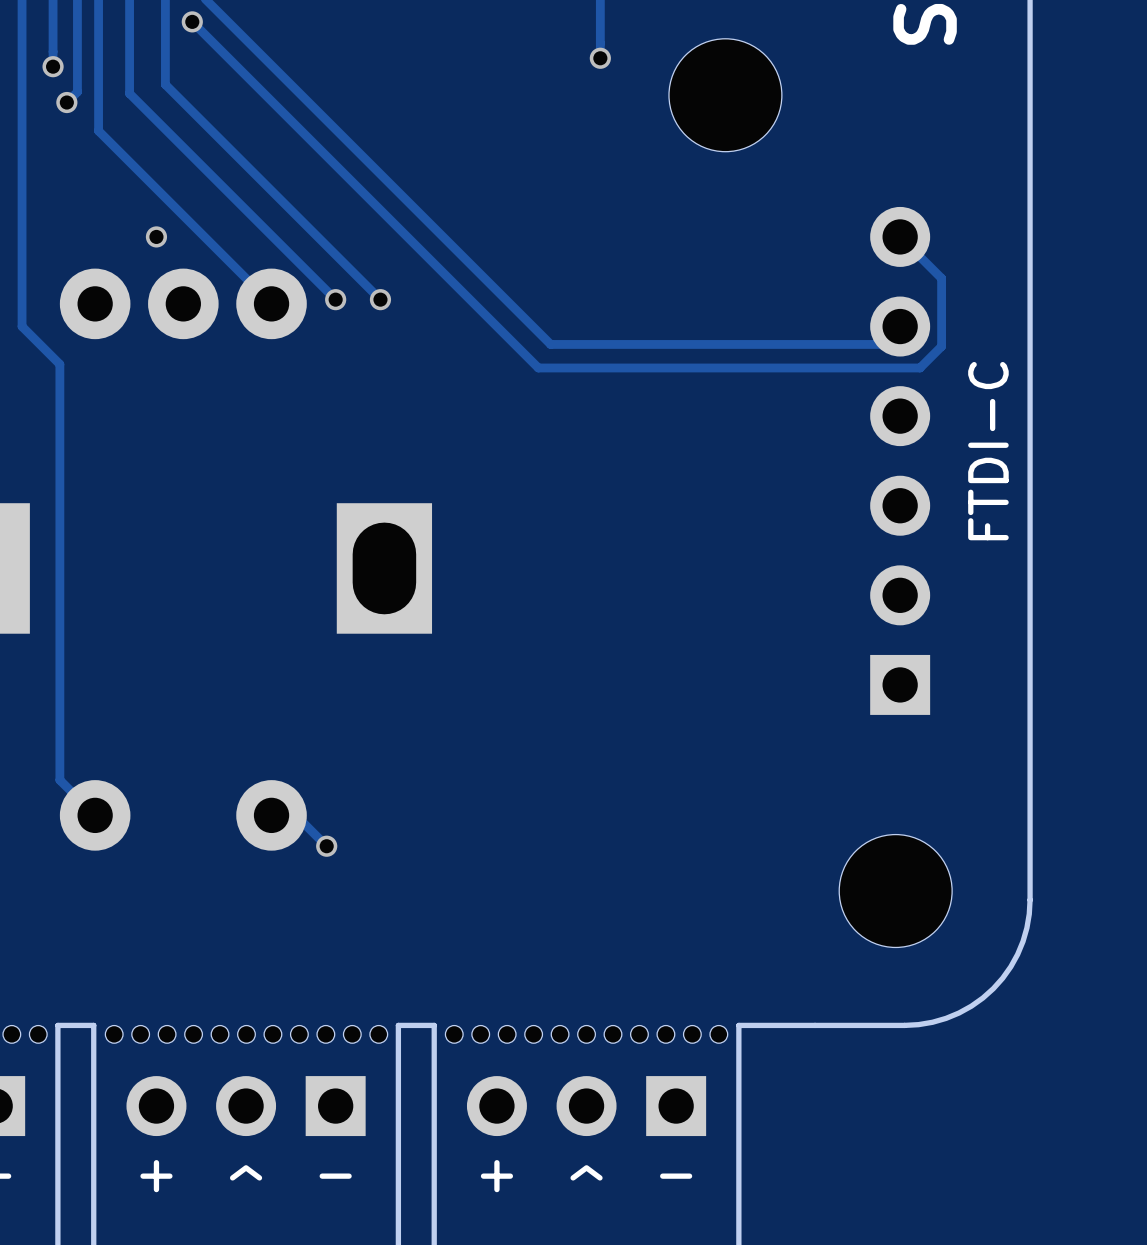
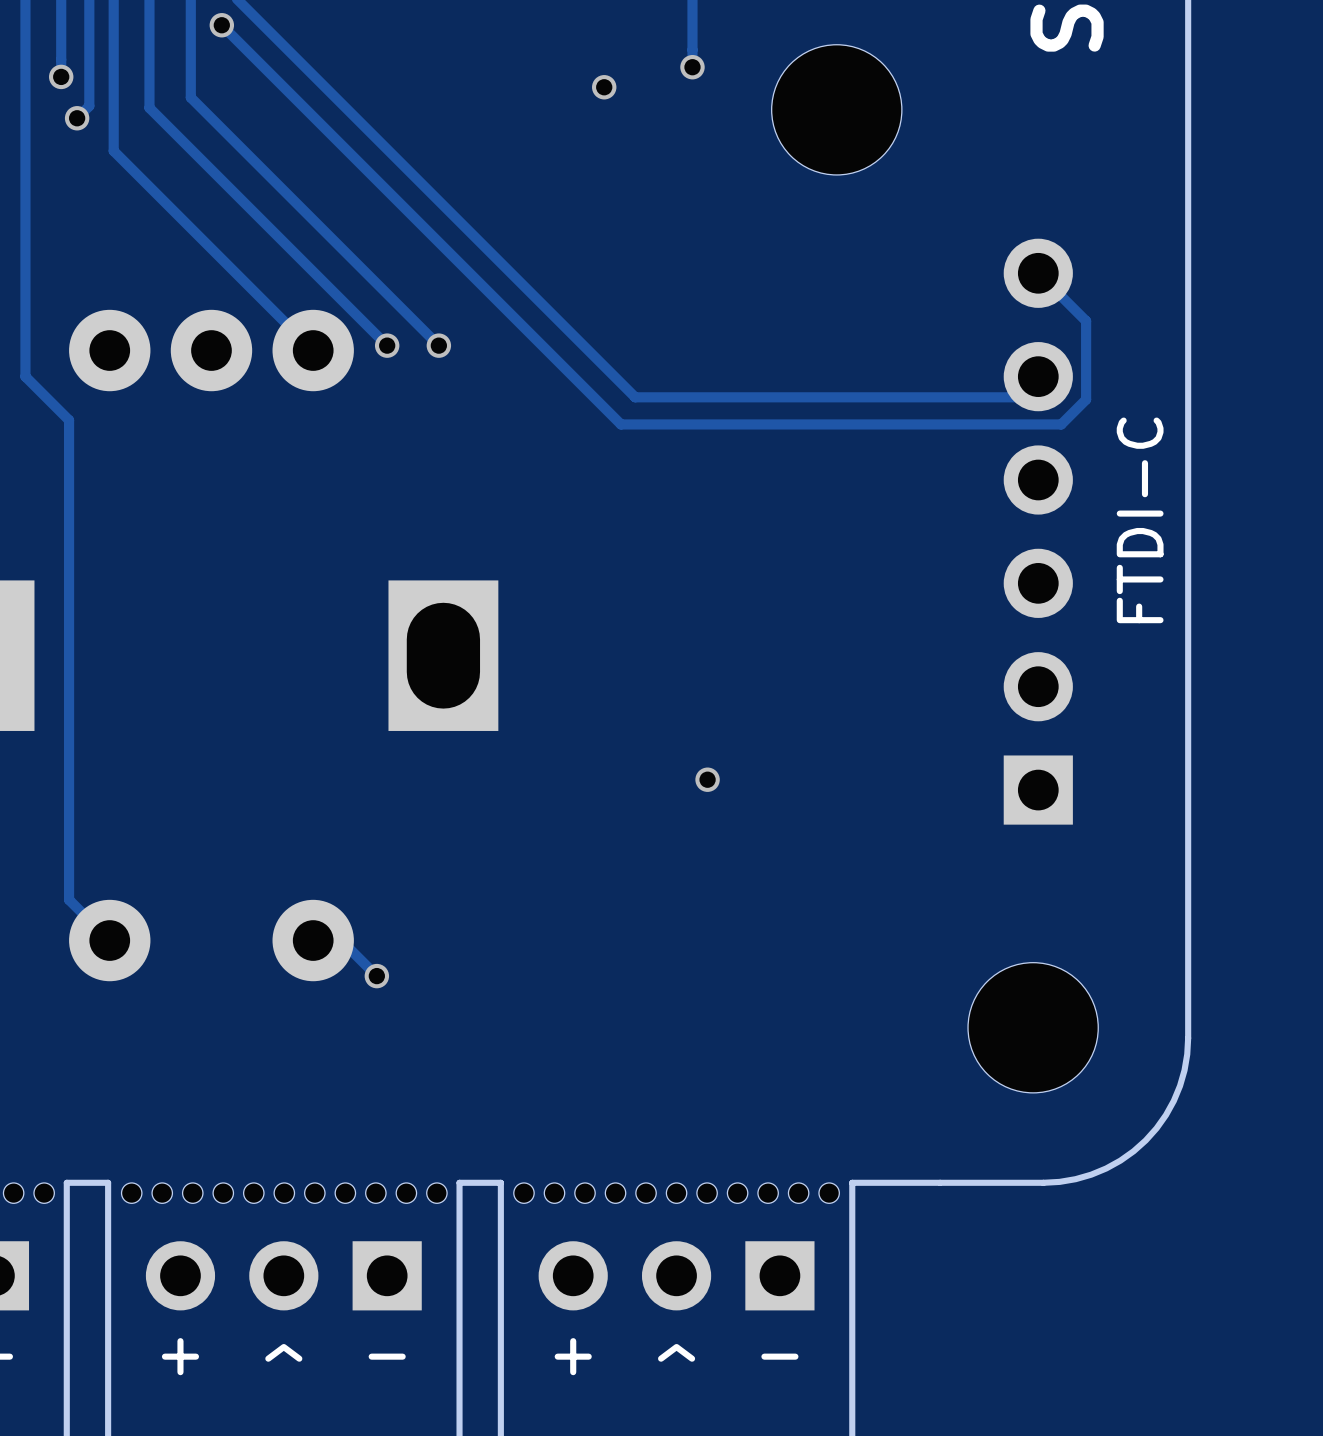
via: none -> (604, 87)
via: (156, 236) -> none
via: none -> (707, 779)

